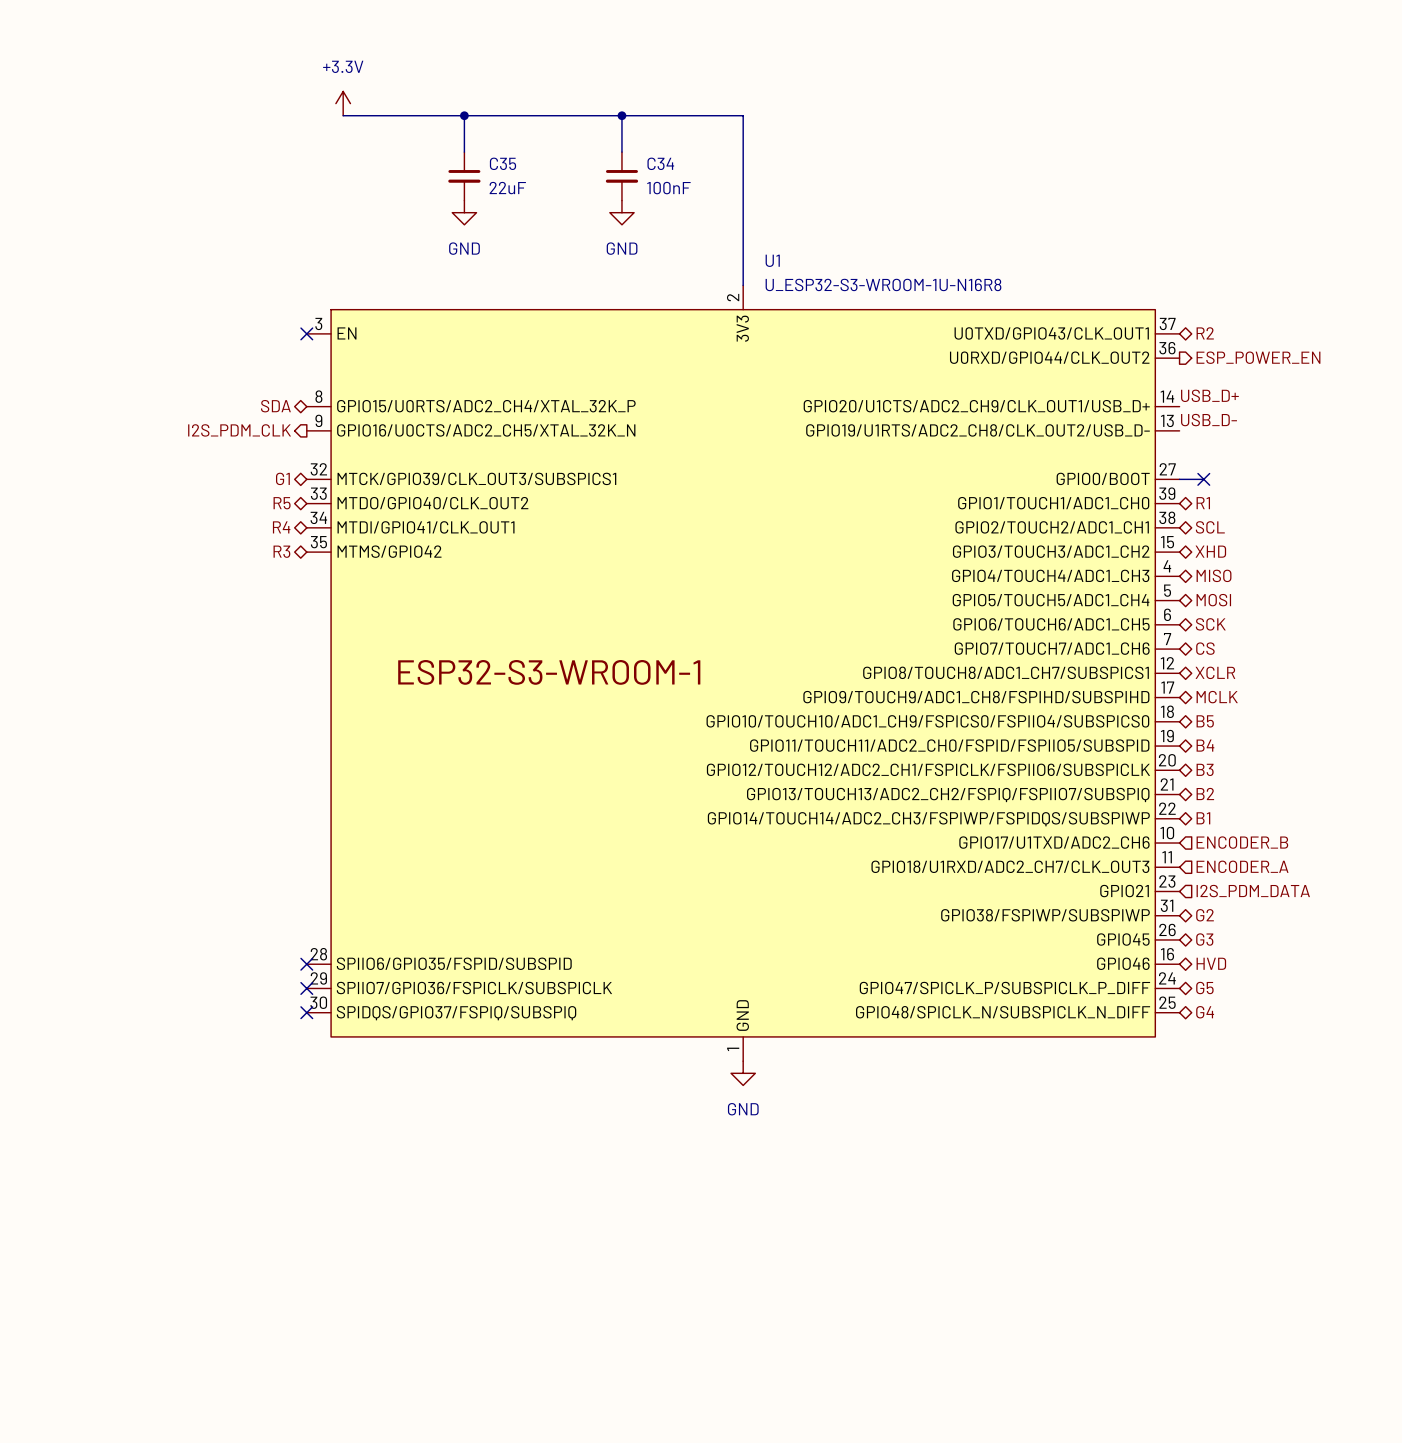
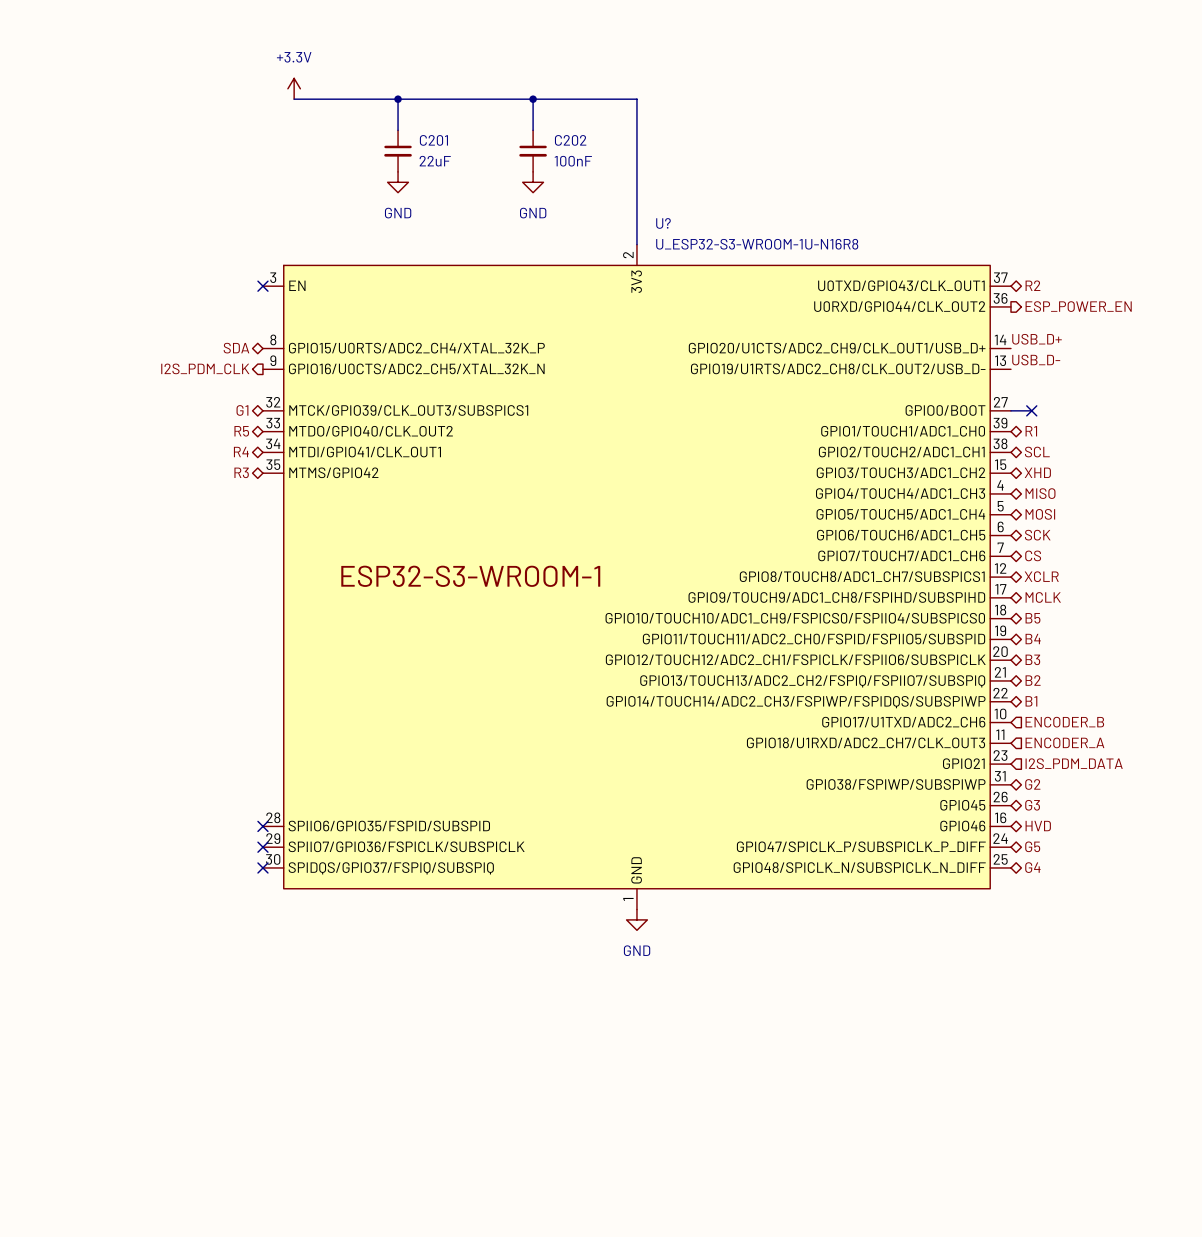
C35 name: C35 (502, 163) -> C201 (433, 140)
C34 name: C34 (660, 163) -> C202 (570, 140)
U1 name: U1 (772, 260) -> U? (663, 223)

